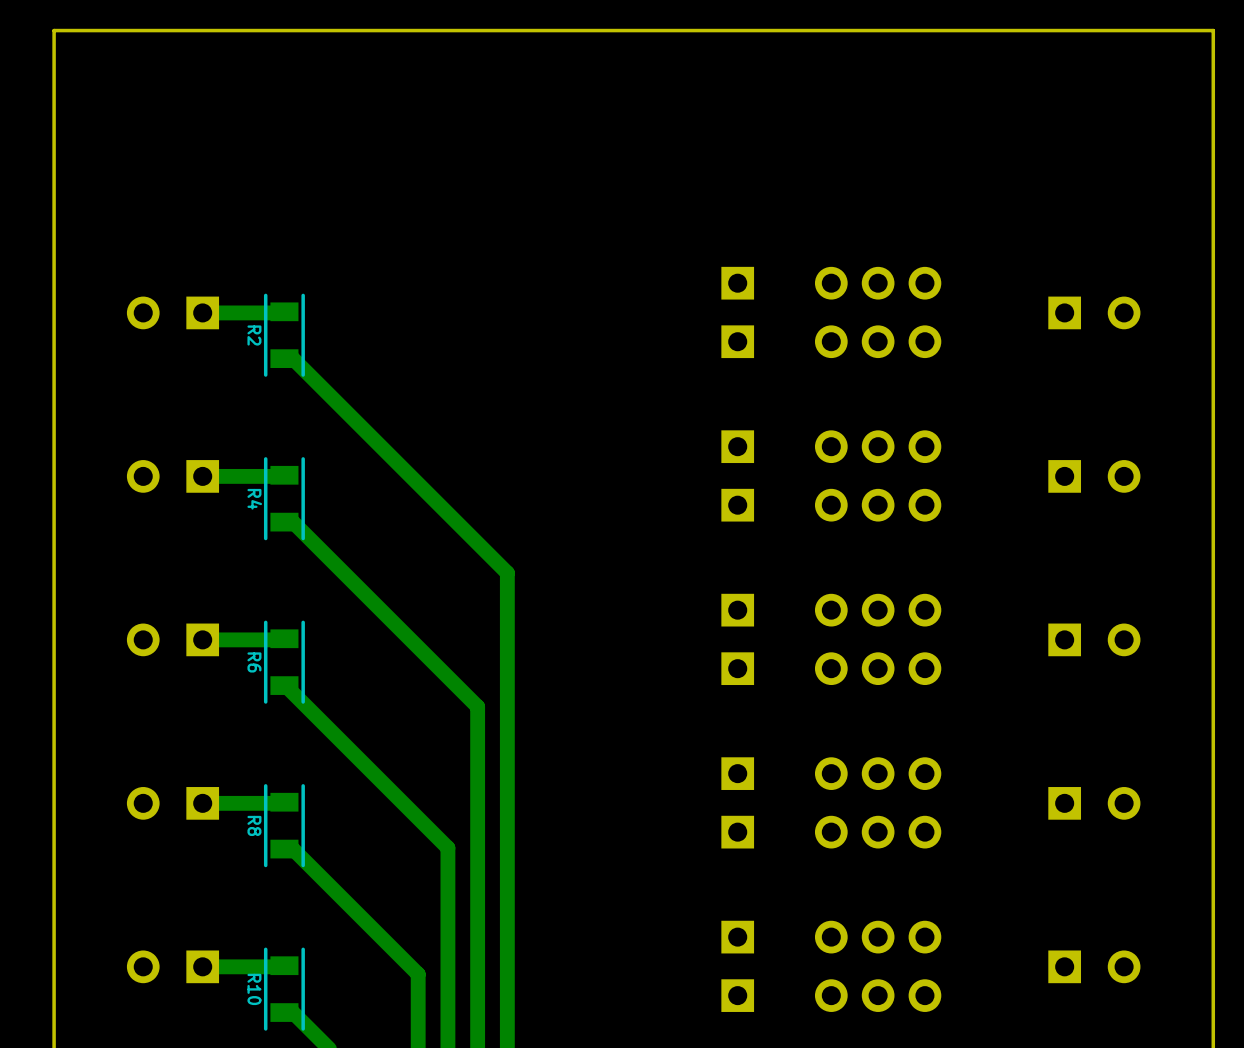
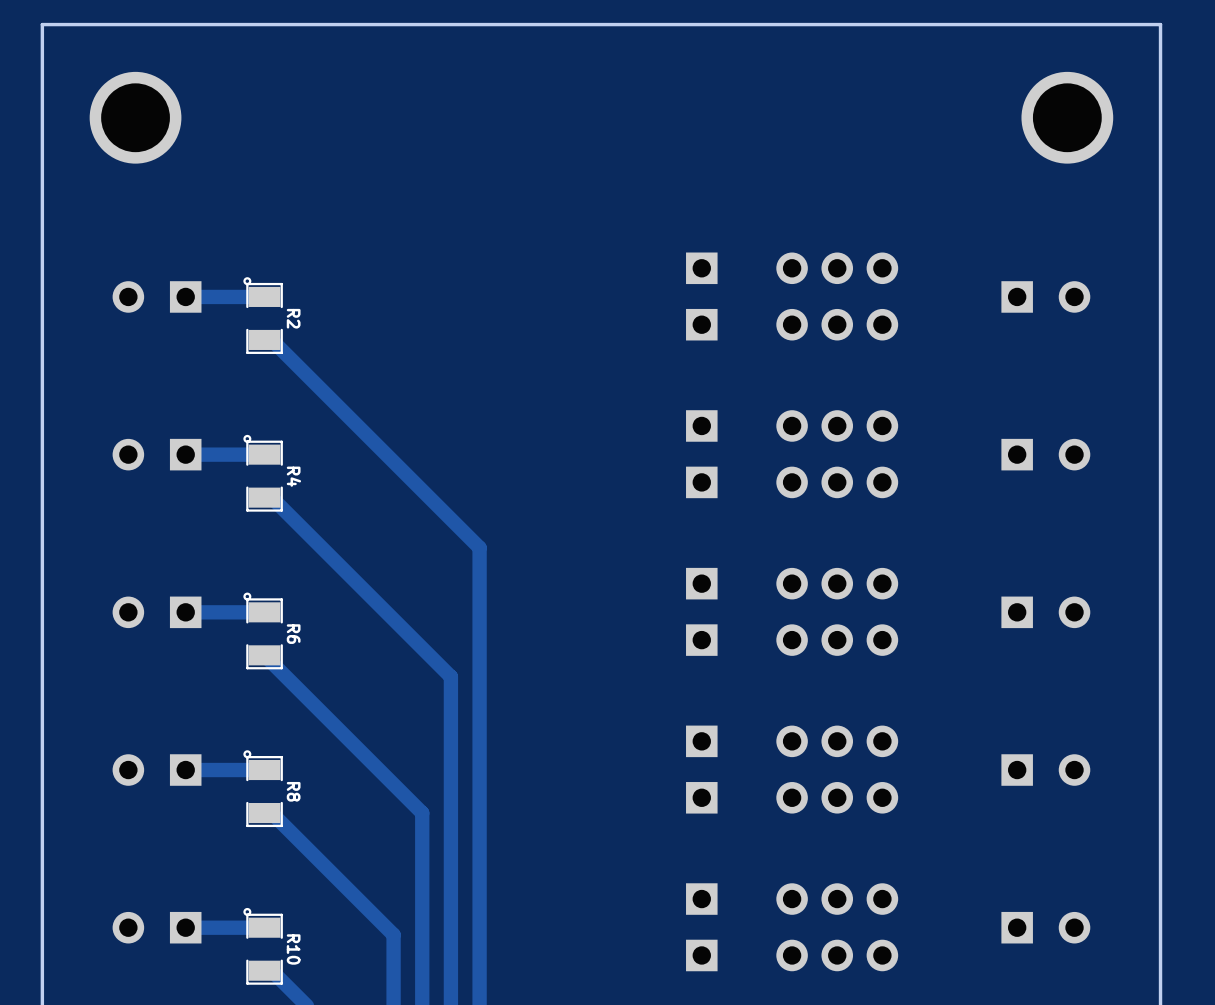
part: none -> (135, 117)
part: none -> (1067, 117)
R2 footprint: [263, 293, 305, 377] -> [243, 277, 283, 354]
R2 name position: R2 (254, 335) -> R2 (293, 318)
R4 footprint: [263, 457, 305, 541] -> [243, 434, 283, 512]
R4 name position: R4 (254, 499) -> R4 (293, 476)
R6 footprint: [263, 620, 305, 704] -> [243, 592, 283, 670]
R6 name position: R6 (254, 662) -> R6 (293, 634)
R8 footprint: [263, 784, 305, 868] -> [243, 750, 283, 828]
R8 name position: R8 (254, 825) -> R8 (293, 791)
R10 footprint: [263, 947, 305, 1031] -> [243, 907, 283, 985]
R10 name position: R10 (254, 989) -> R10 (293, 949)

